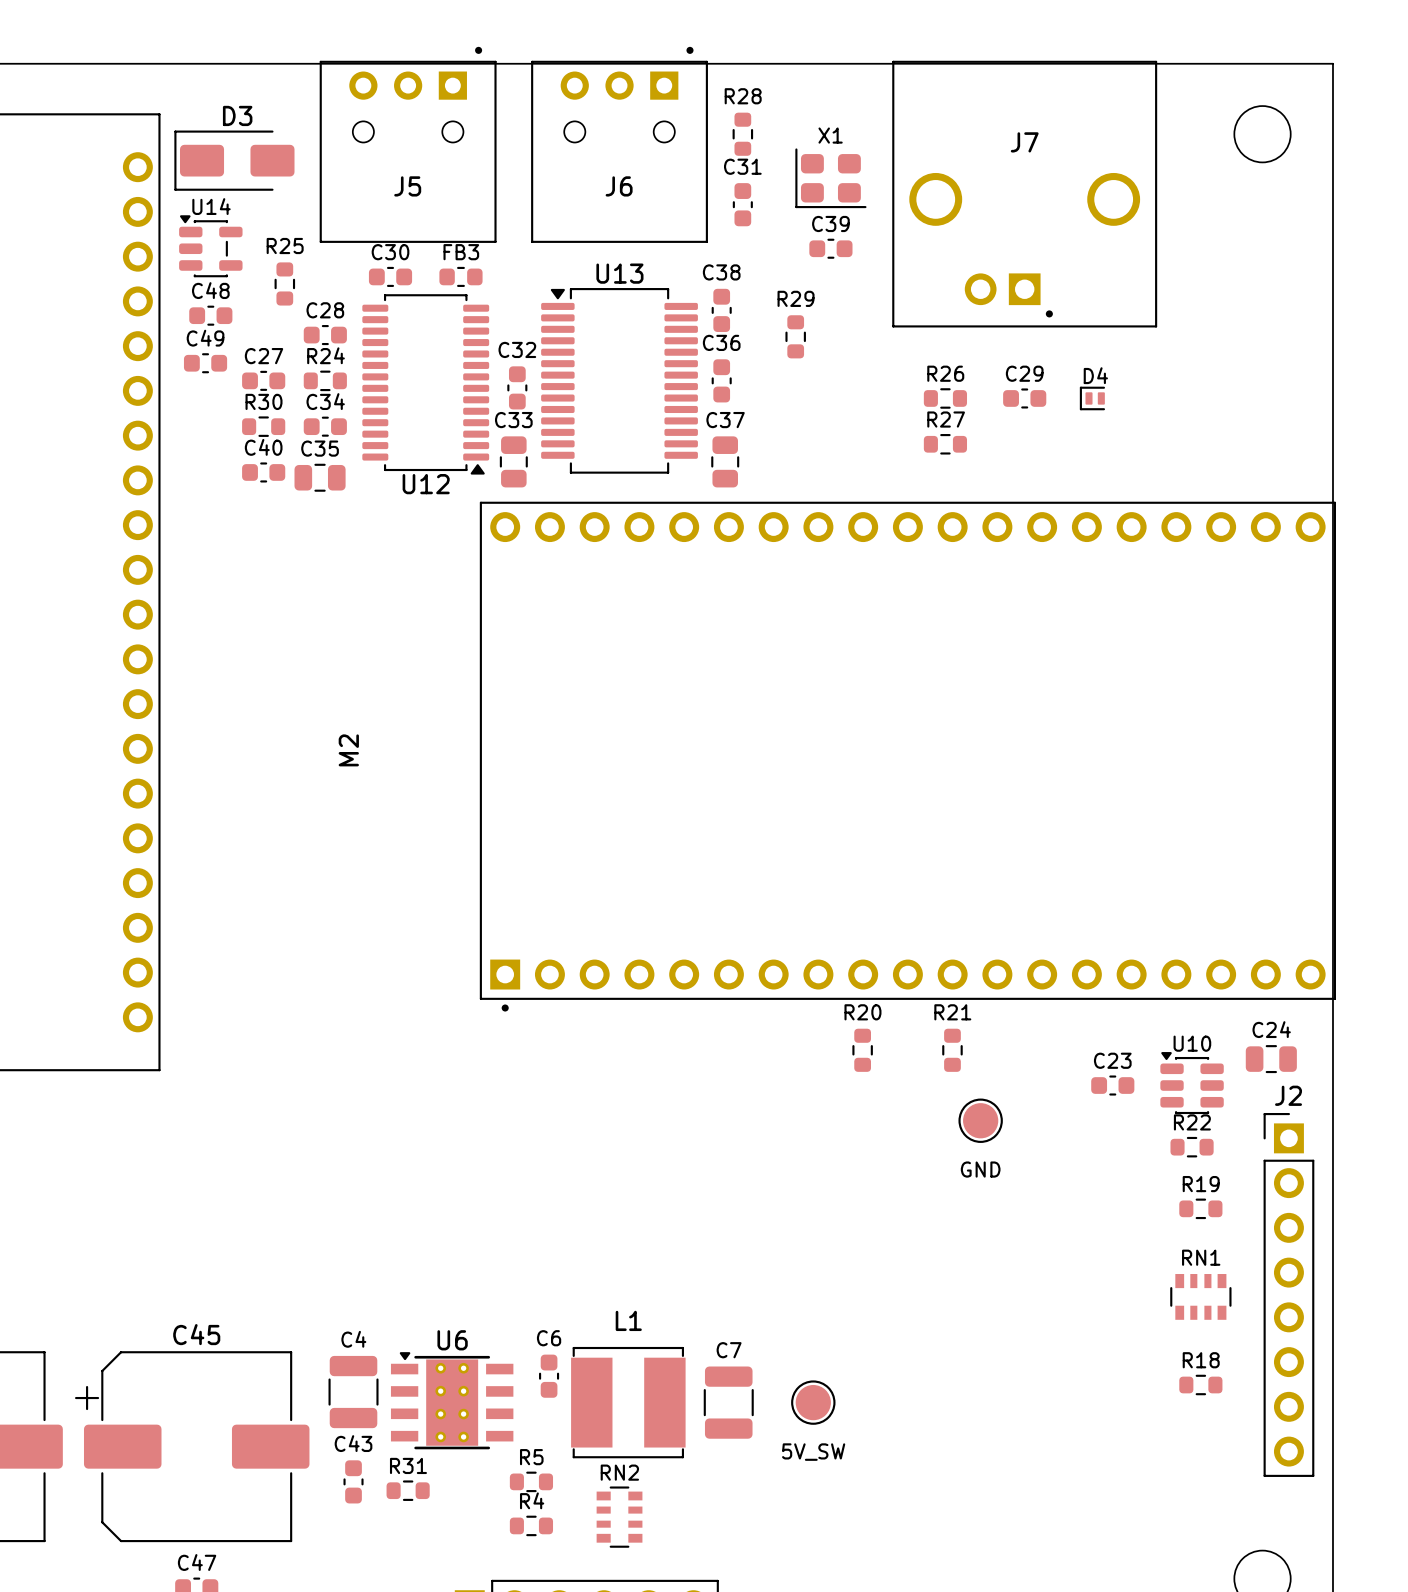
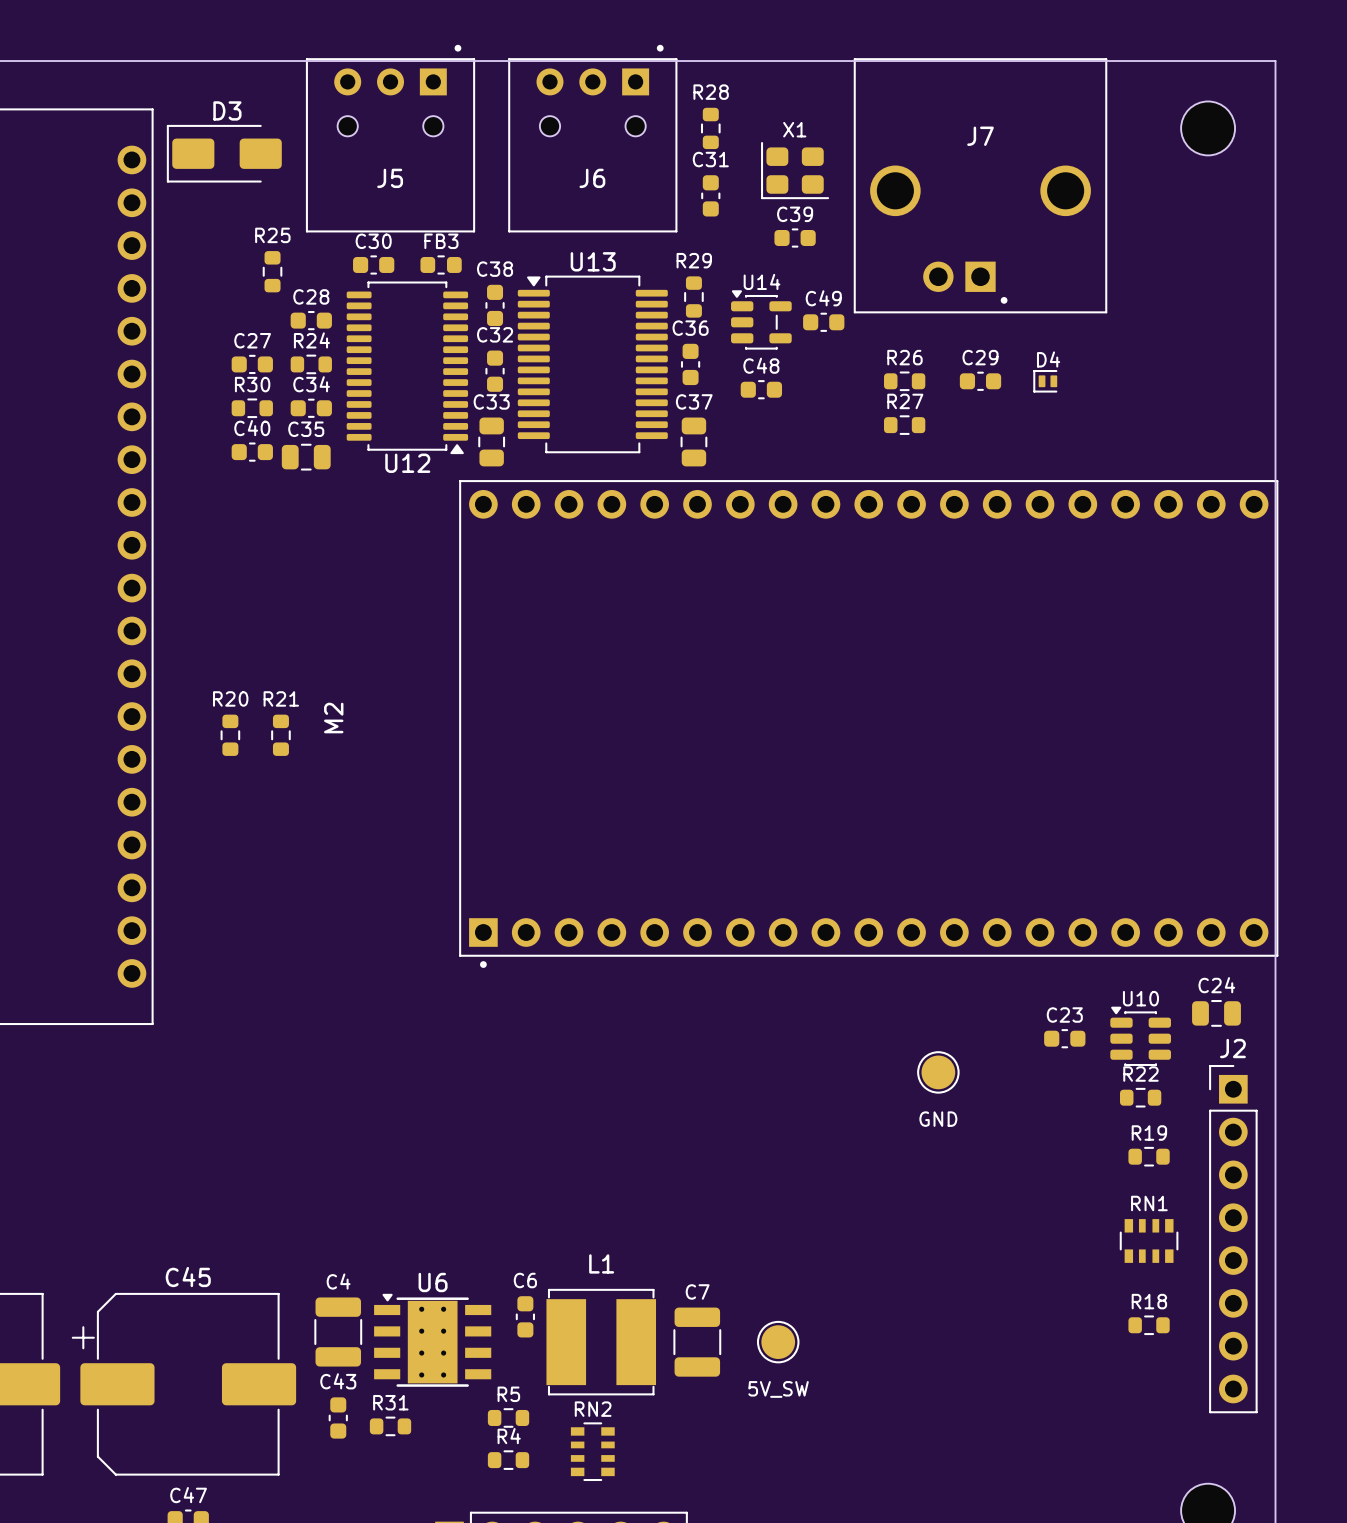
U14 position: (210, 246) -> (761, 319)
C38 position: (721, 310) -> (495, 305)
C48 position: (210, 315) -> (761, 389)
R29 position: (795, 336) -> (693, 297)
C49 position: (205, 363) -> (823, 322)
R20 position: (862, 1050) -> (230, 735)
R21 position: (952, 1050) -> (280, 735)

